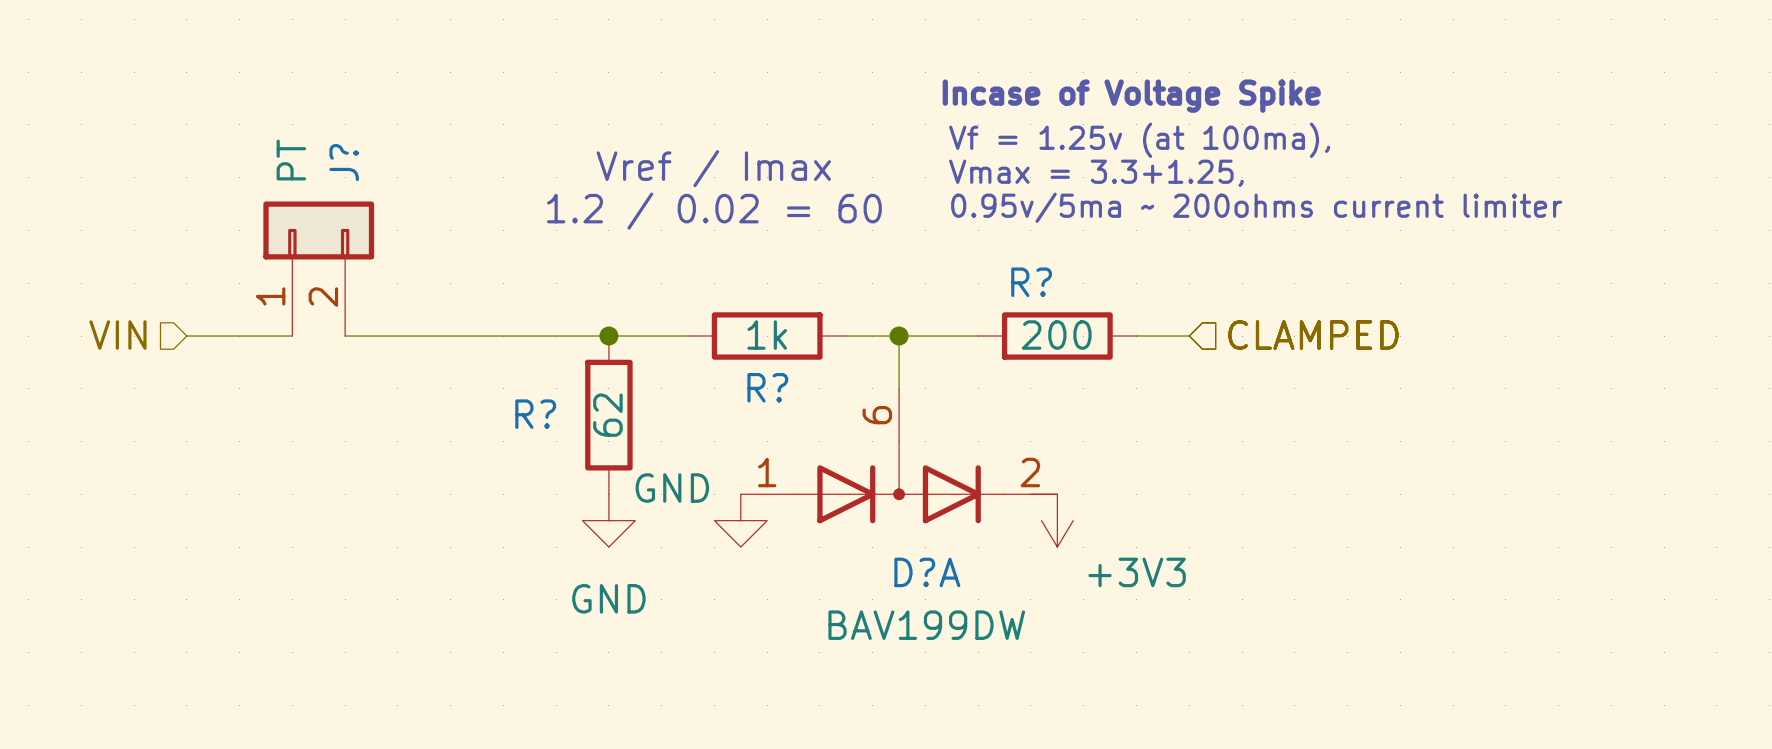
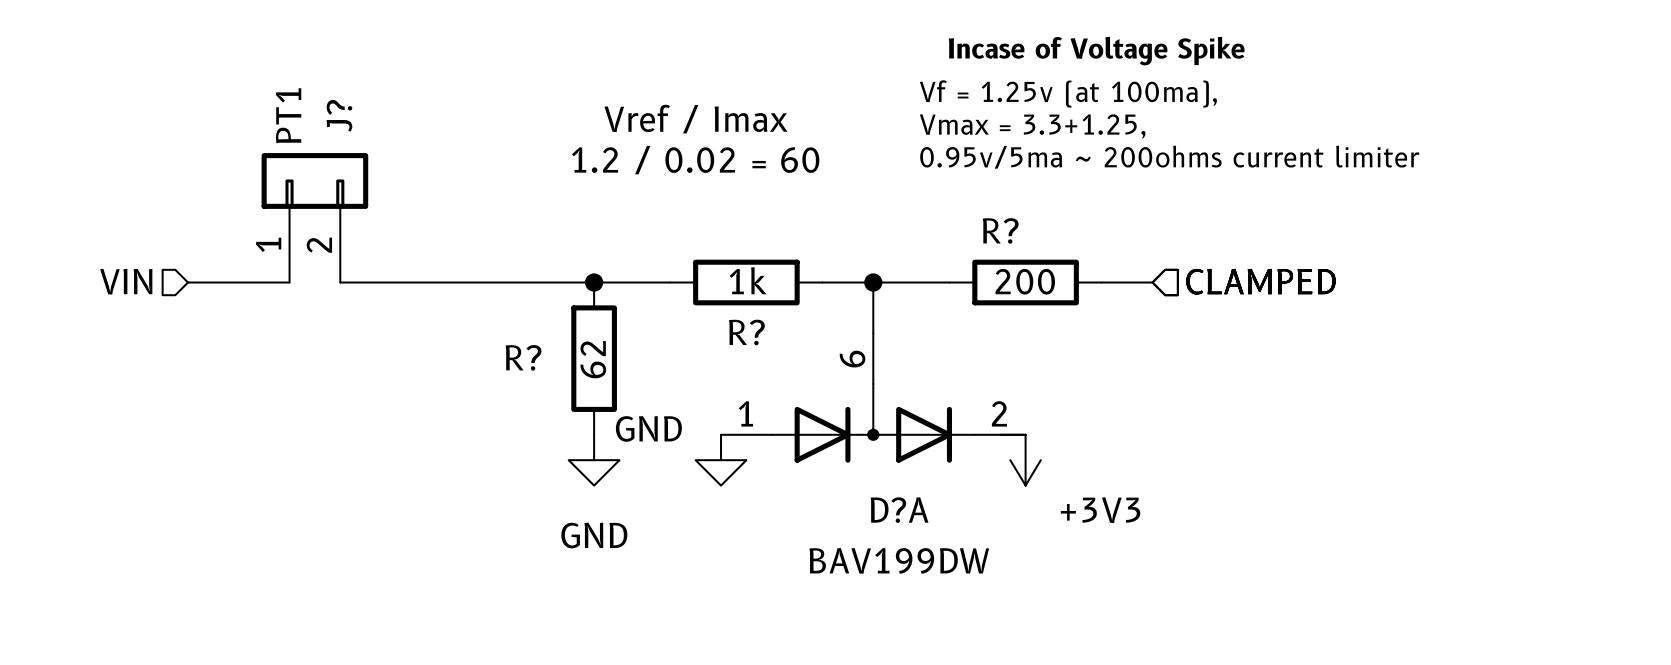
J? value: PT (291, 160) -> PT1 (288, 115)

